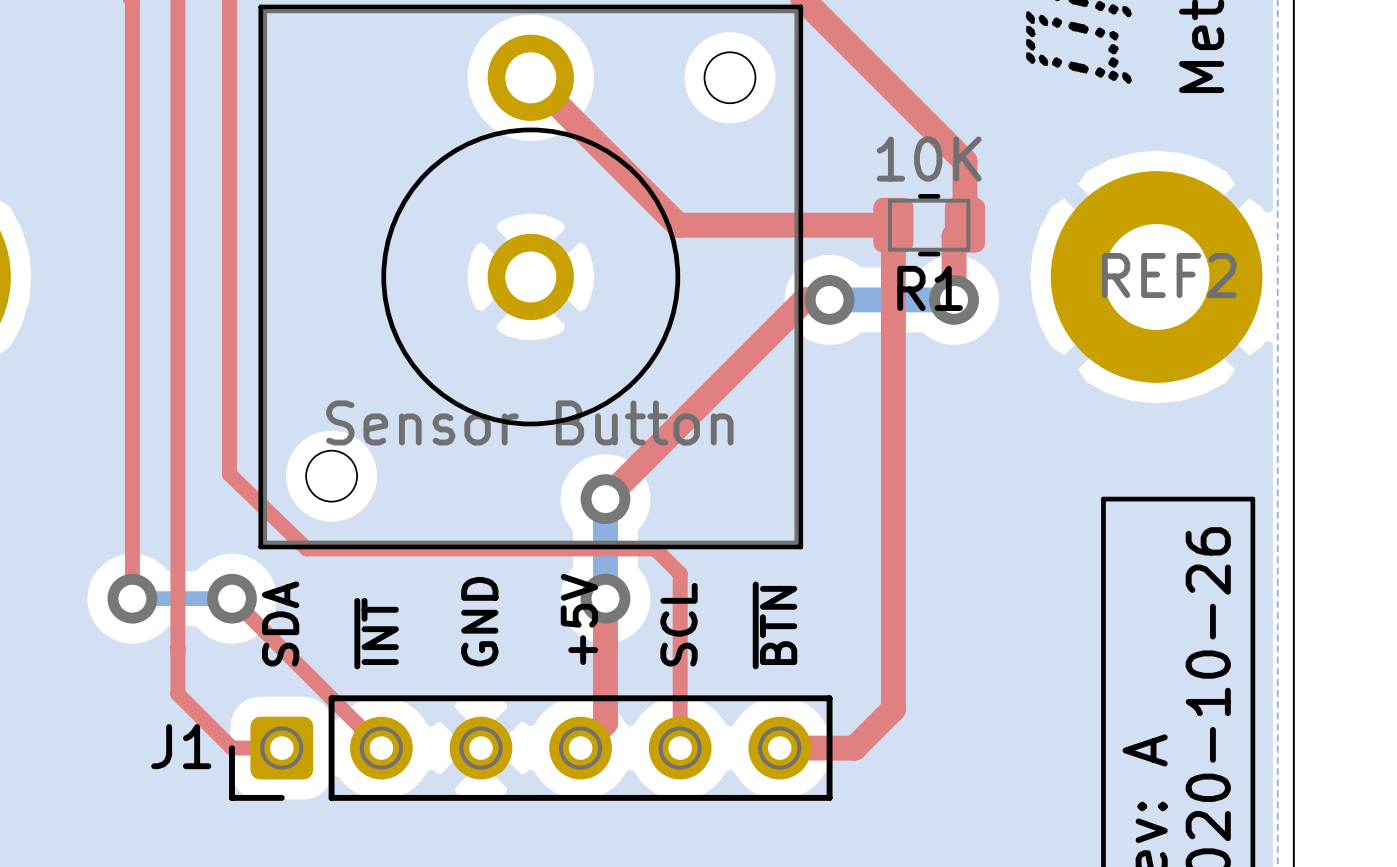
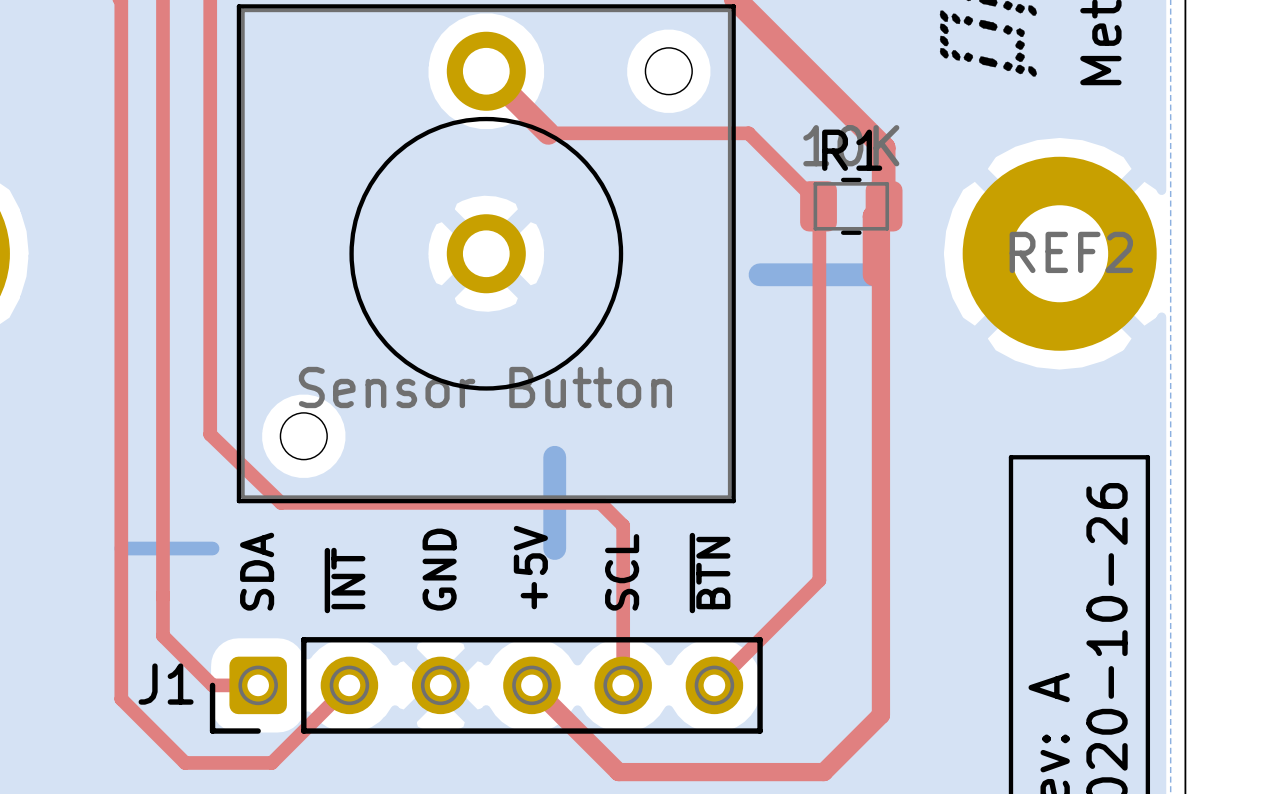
top track: (598, 145) (678, 225) (893, 225) (893, 709) (854, 748) (779, 748) -> (548, 133) (748, 133) (821, 206) (819, 208) (819, 580) (714, 685)
R1 name position: R1 (930, 288) -> R1 (852, 150)
top track: (829, 299) (804, 299) (605, 499) -> none
via: (829, 299) -> none
via: (954, 299) -> none
via: (605, 499) -> none
via: (132, 598) -> none
top track: (231, 598) (381, 748) -> (121, 548) (121, 699) (185, 762) (271, 762) (349, 685)
via: (231, 598) -> none
via: (605, 598) -> none
top track: (601, 602) (605, 598) (605, 723) (580, 748) -> (880, 144) (880, 715) (823, 772) (618, 772) (531, 685)

